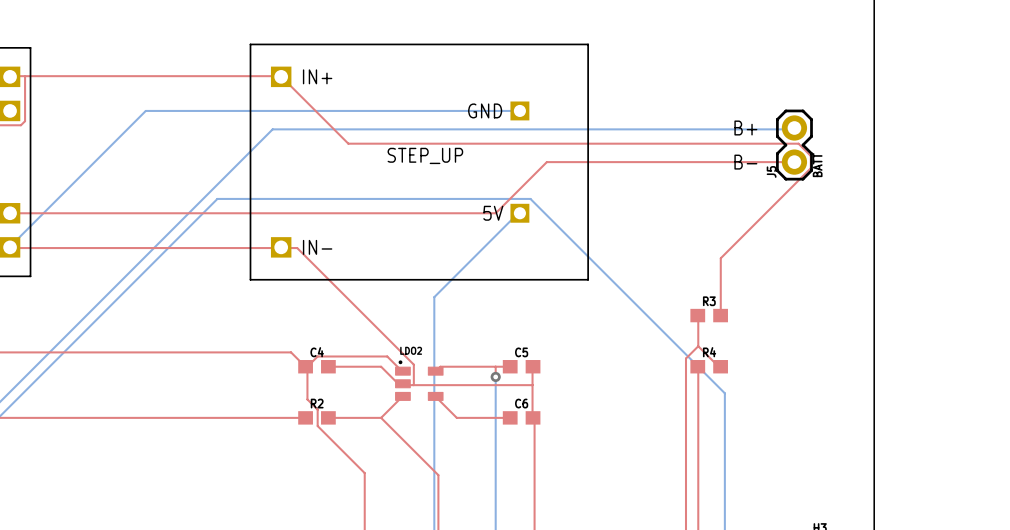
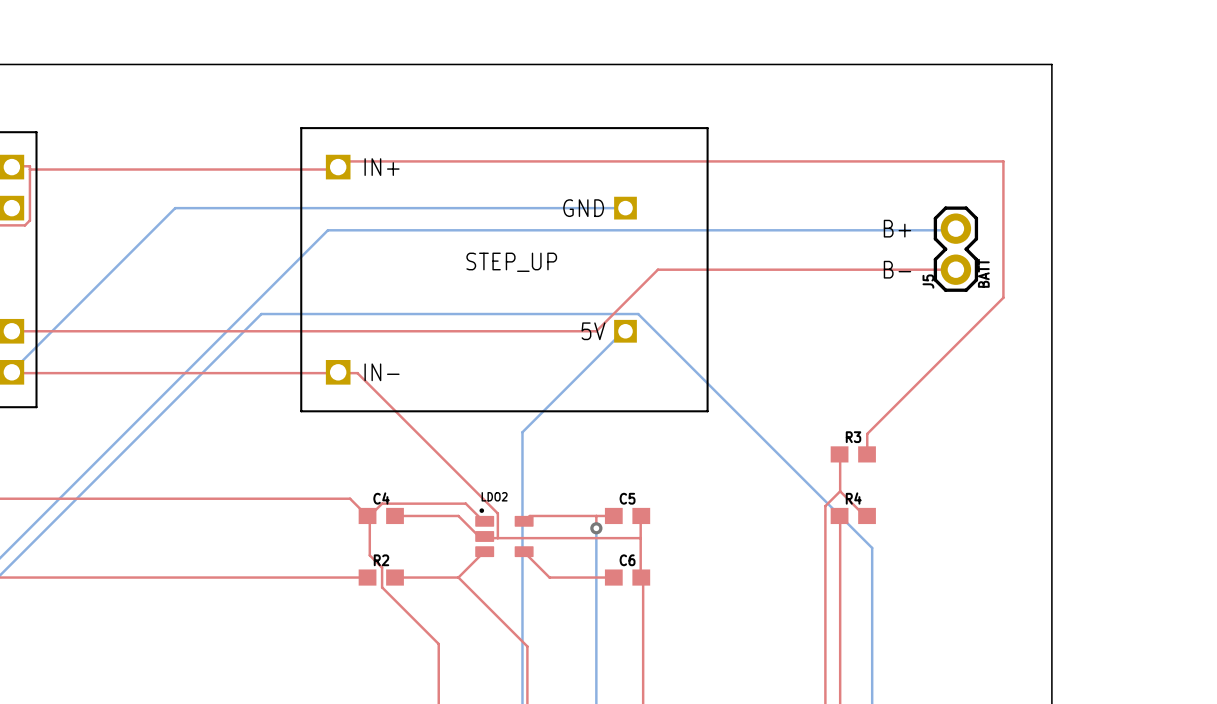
top track: (25, 76) (280, 76) (348, 143) (798, 143) (810, 155) (810, 168) (720, 258) (720, 298) -> (29, 169) (335, 169) (343, 161) (1003, 161) (1003, 297) (867, 433)

